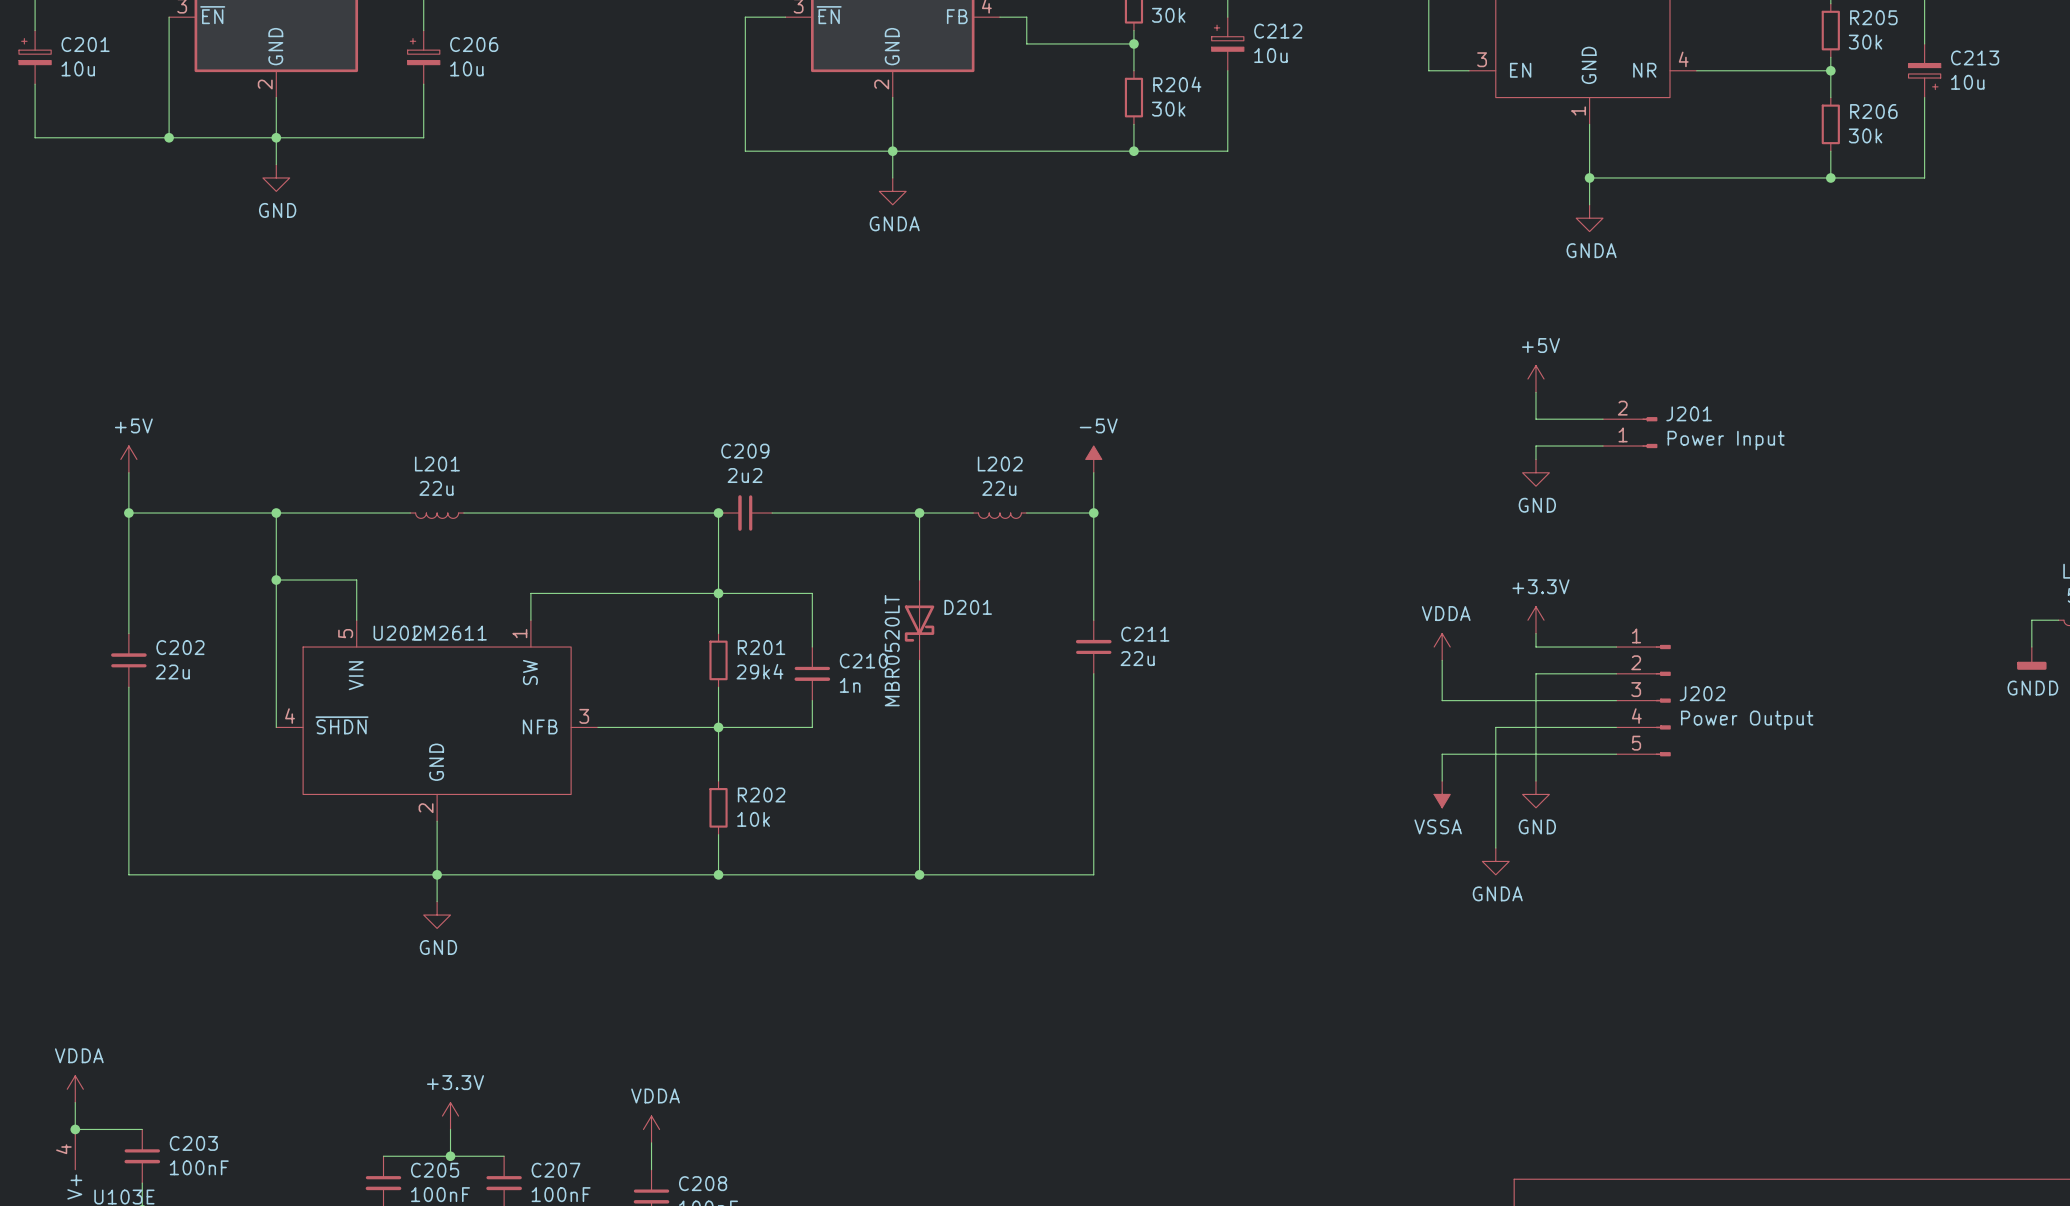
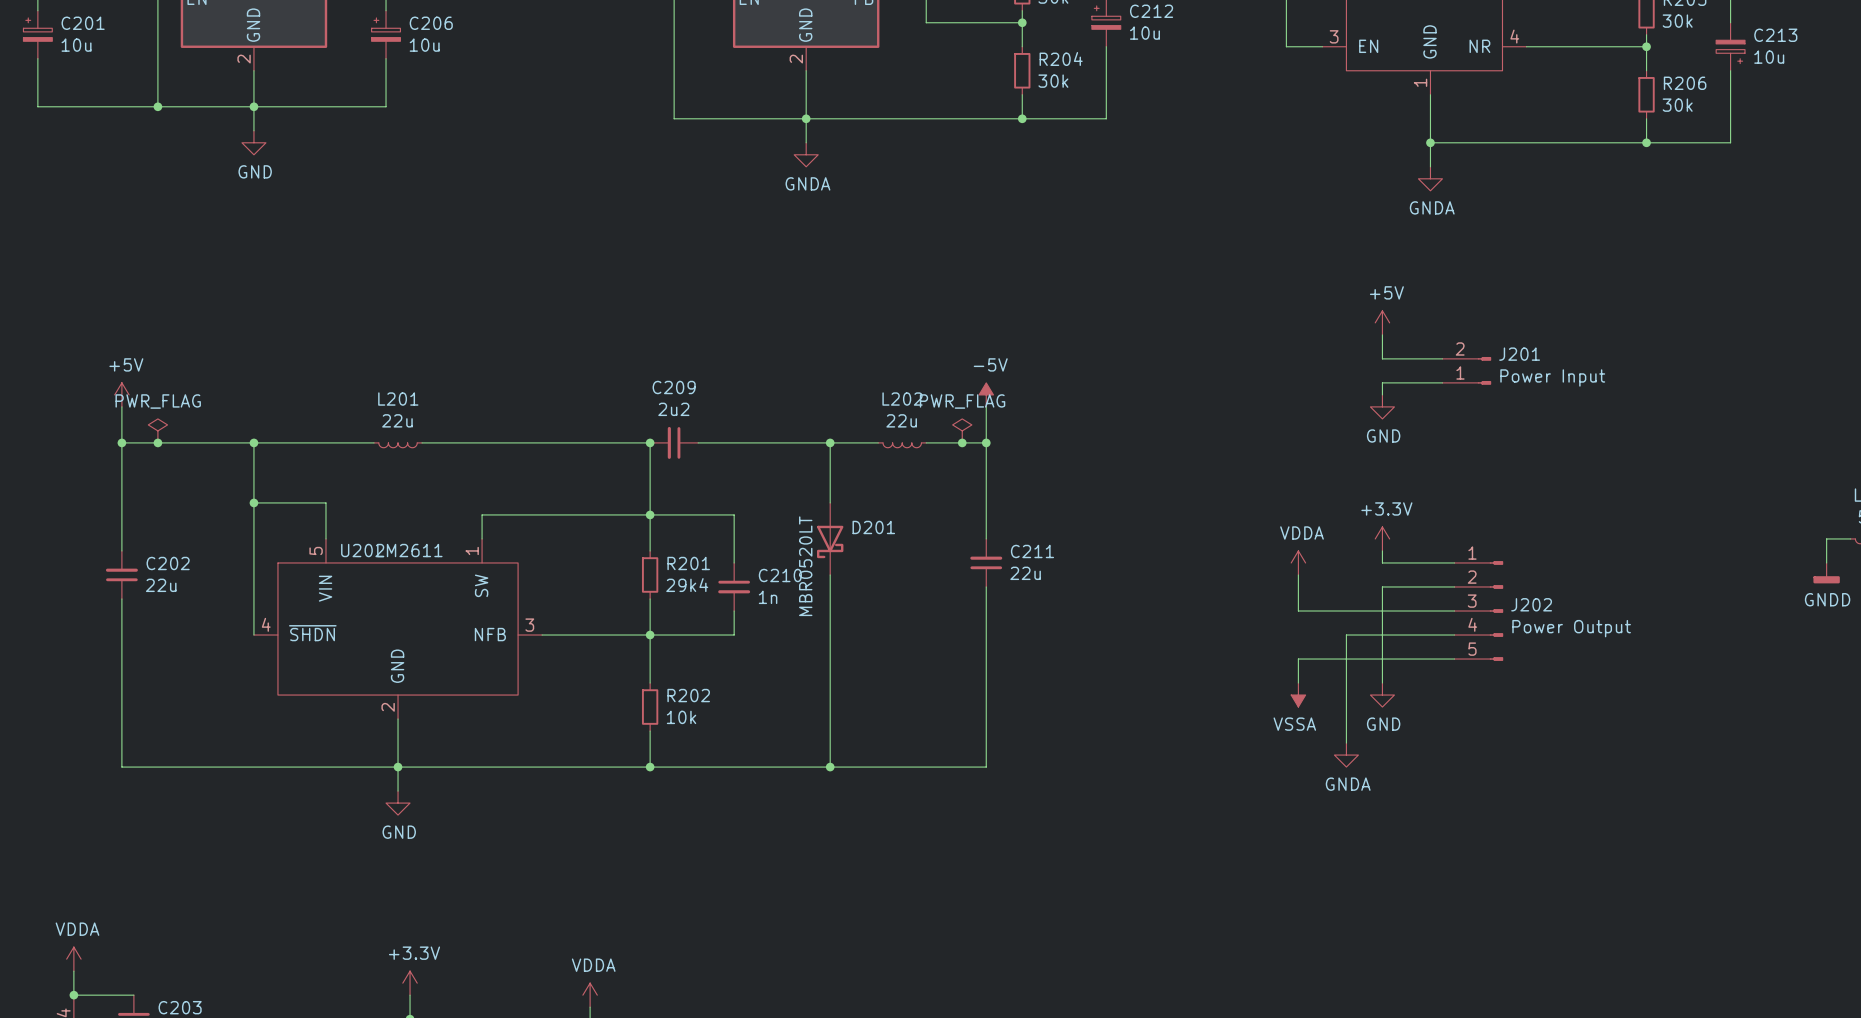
power symbol: none -> PWR_FLAG (157, 430)
power symbol: none -> PWR_FLAG (962, 430)
junction: none -> (157, 442)
junction: none -> (962, 442)

